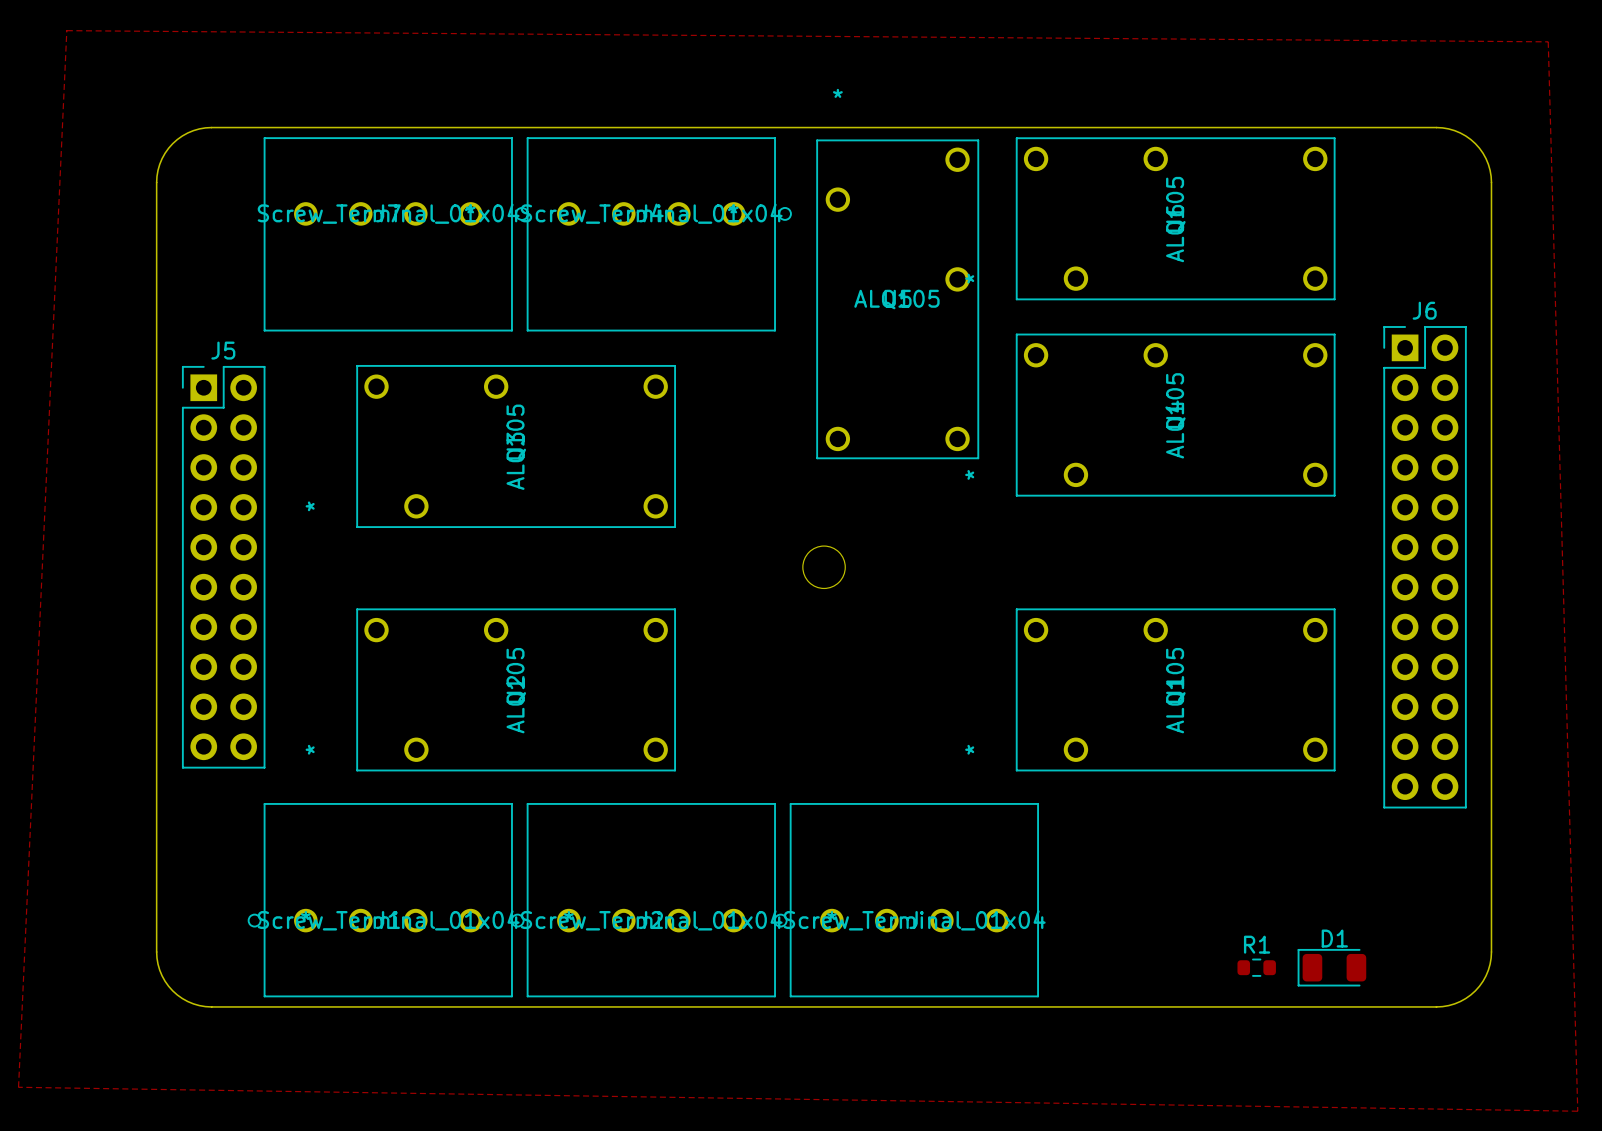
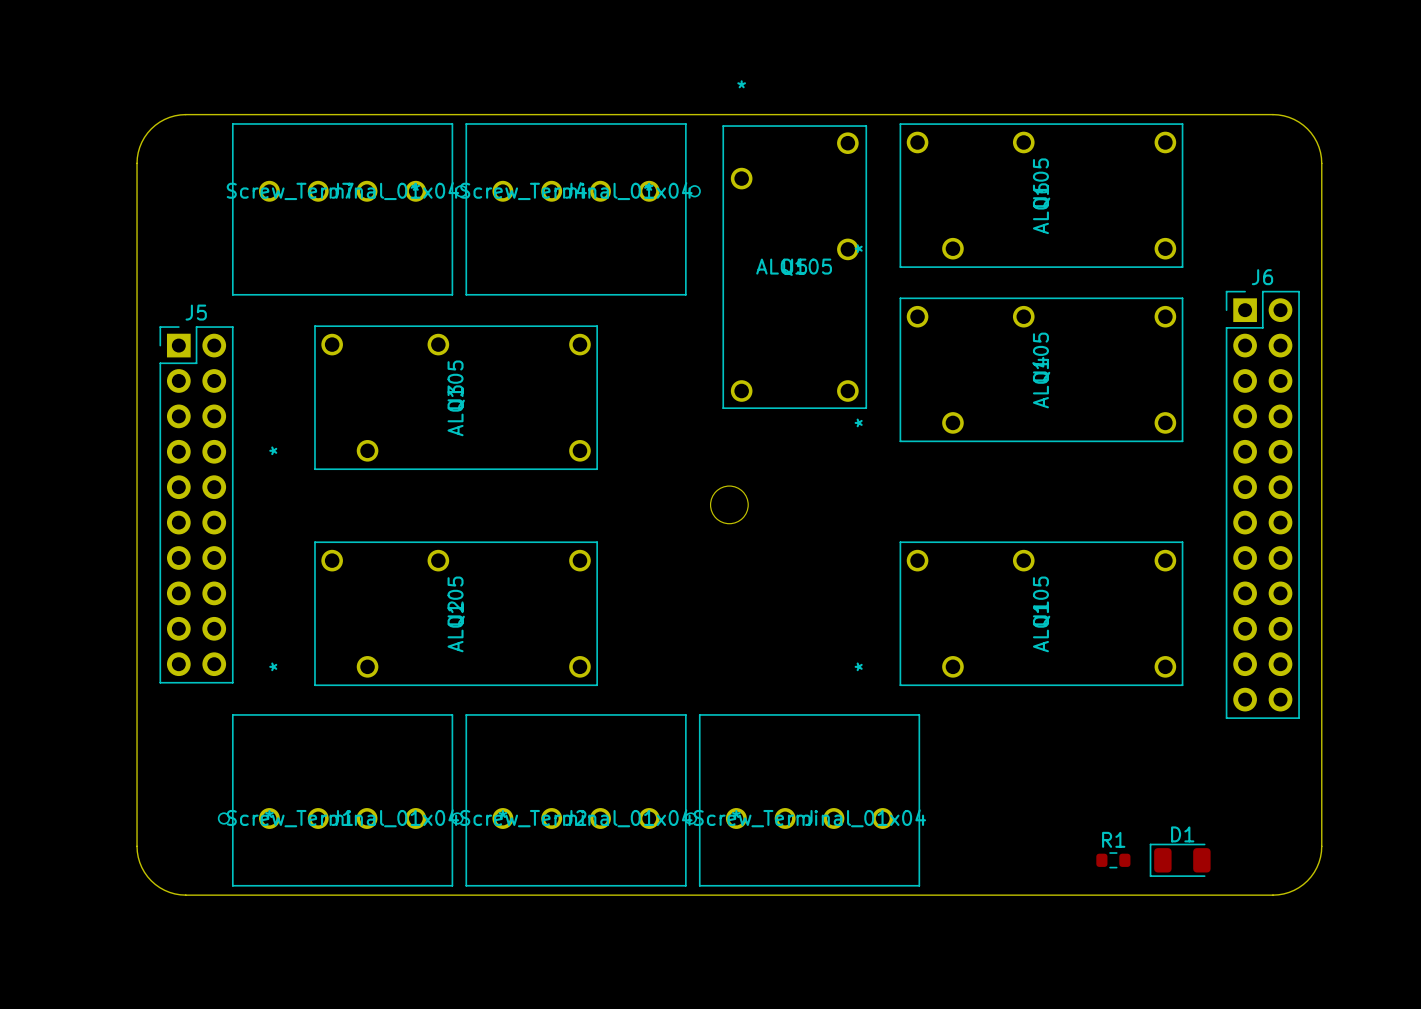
zone outline: (66, 30) (1548, 41) (1577, 1111) (18, 1087) (66, 30) -> none

